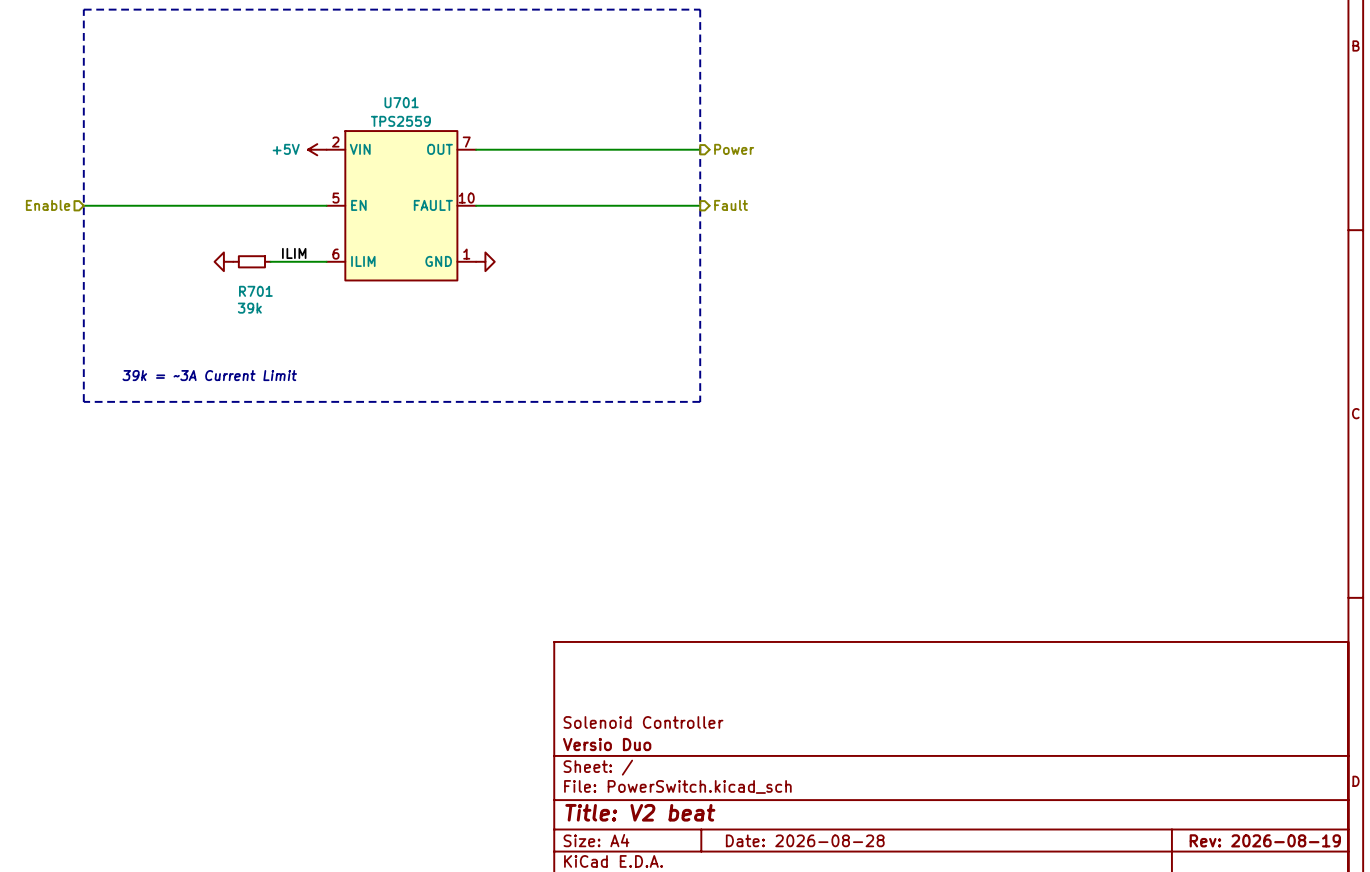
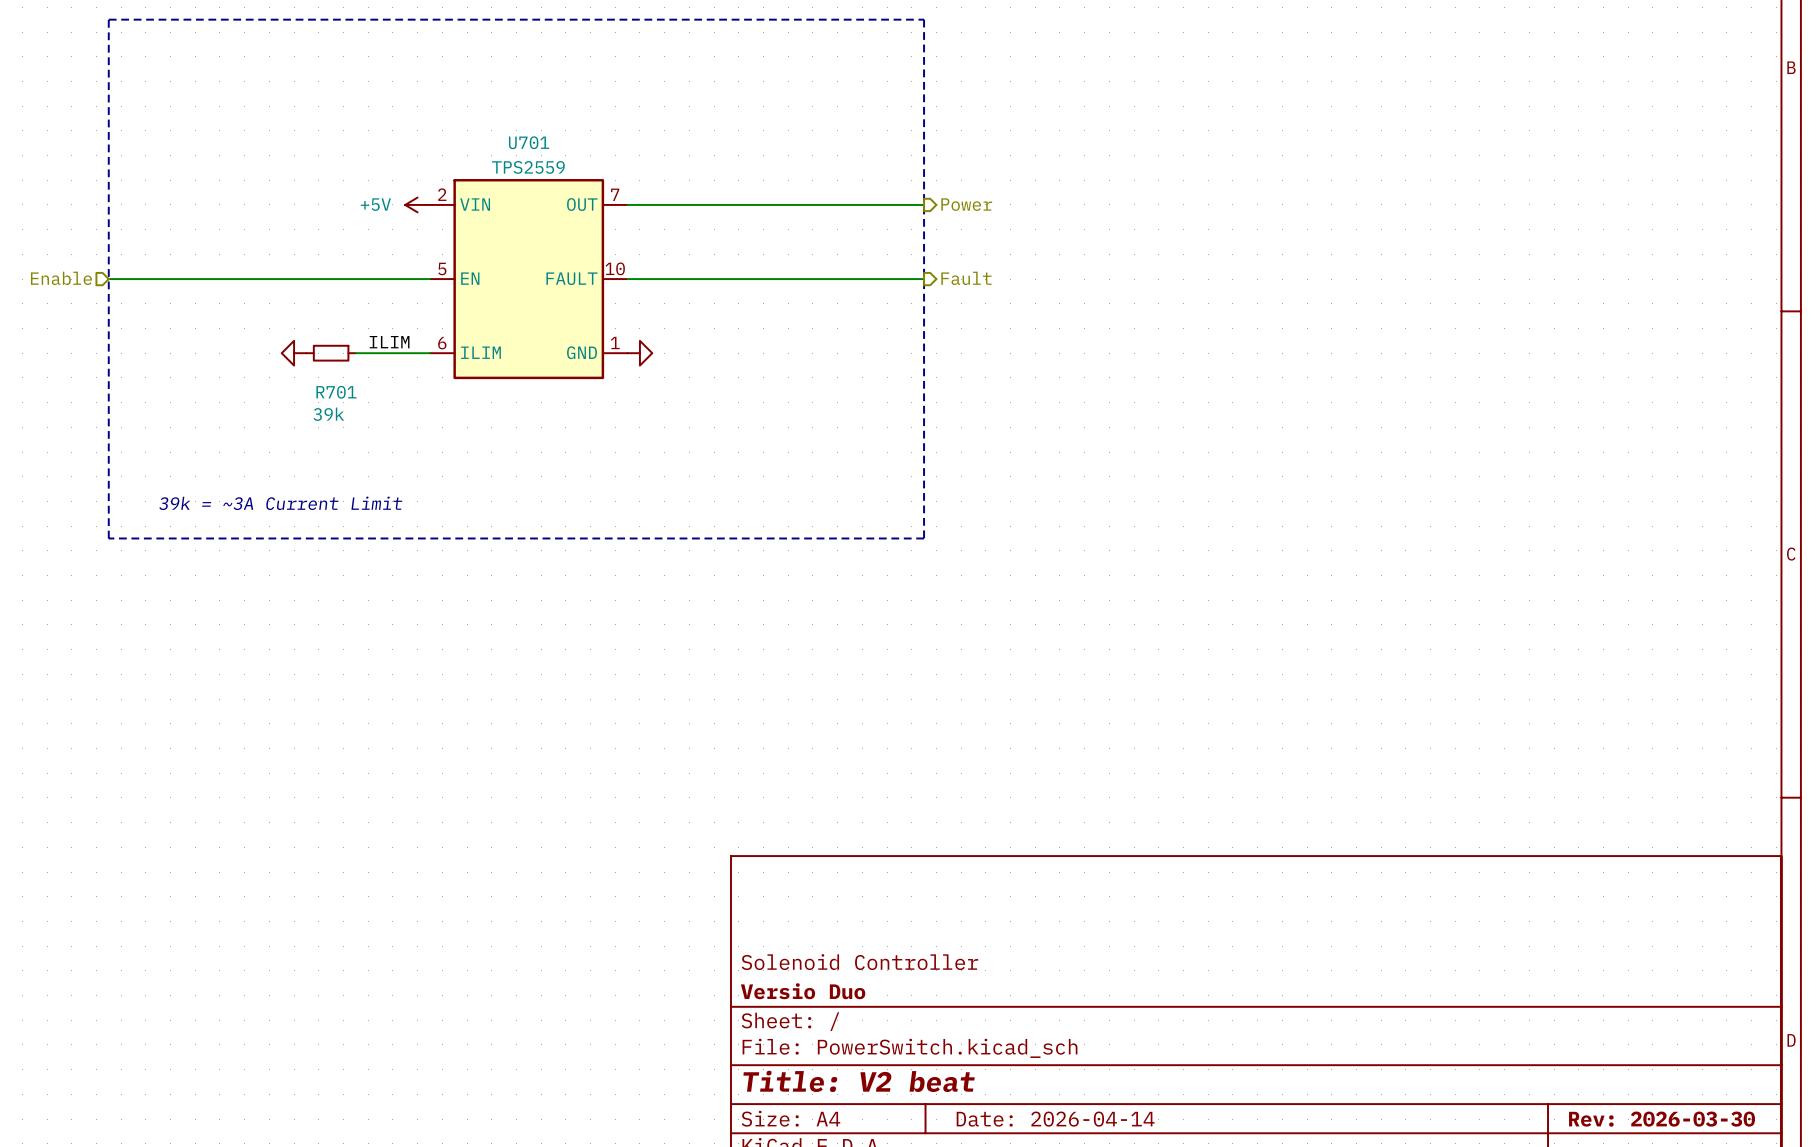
title block: Date: 2026-08-28 (805, 840) -> Date: 2026-04-14 (1055, 1119)
title block: Rev: 2026-08-19 (1265, 840) -> Rev: 2026-03-30 (1662, 1119)

